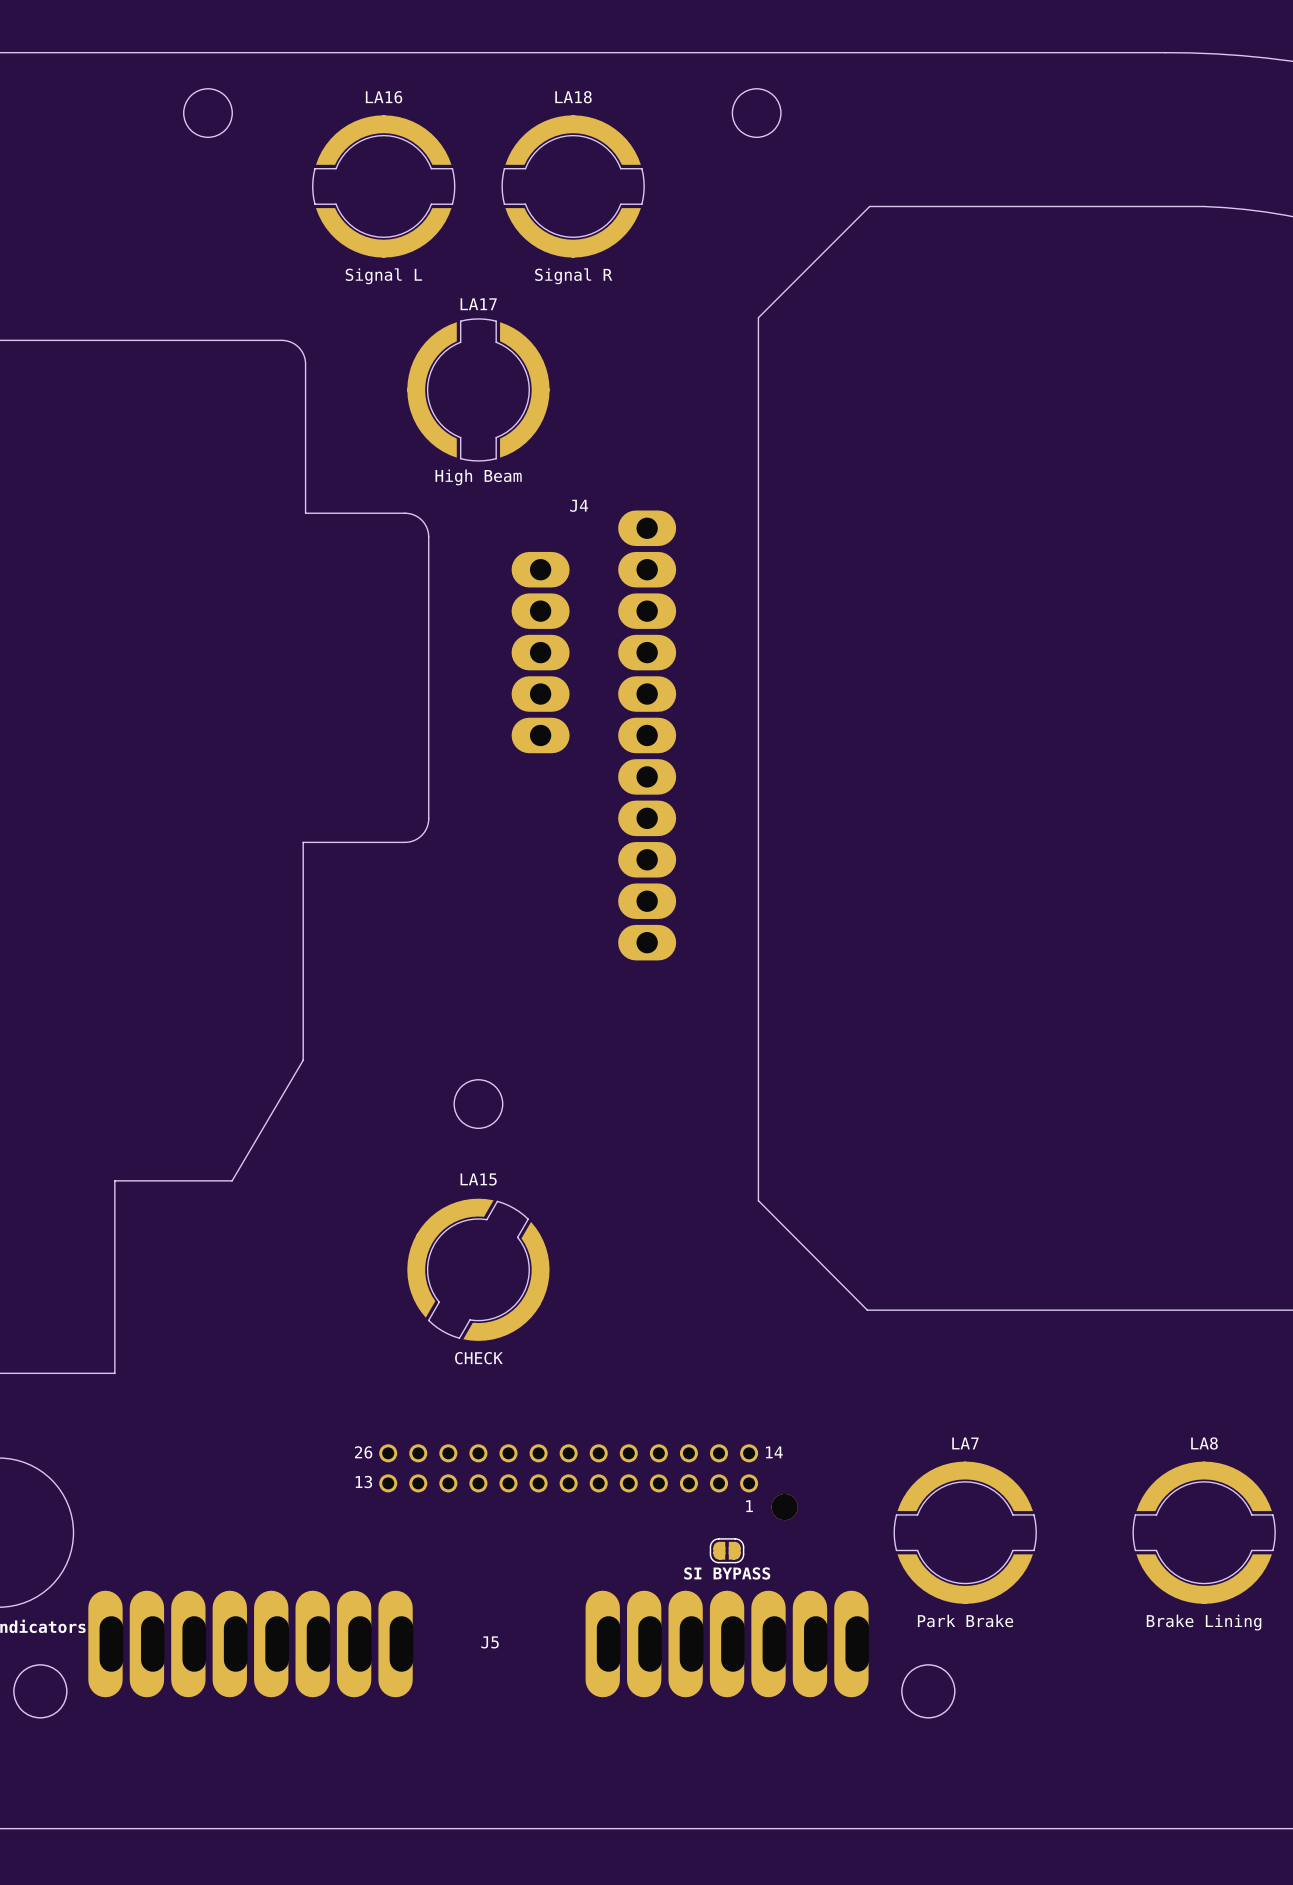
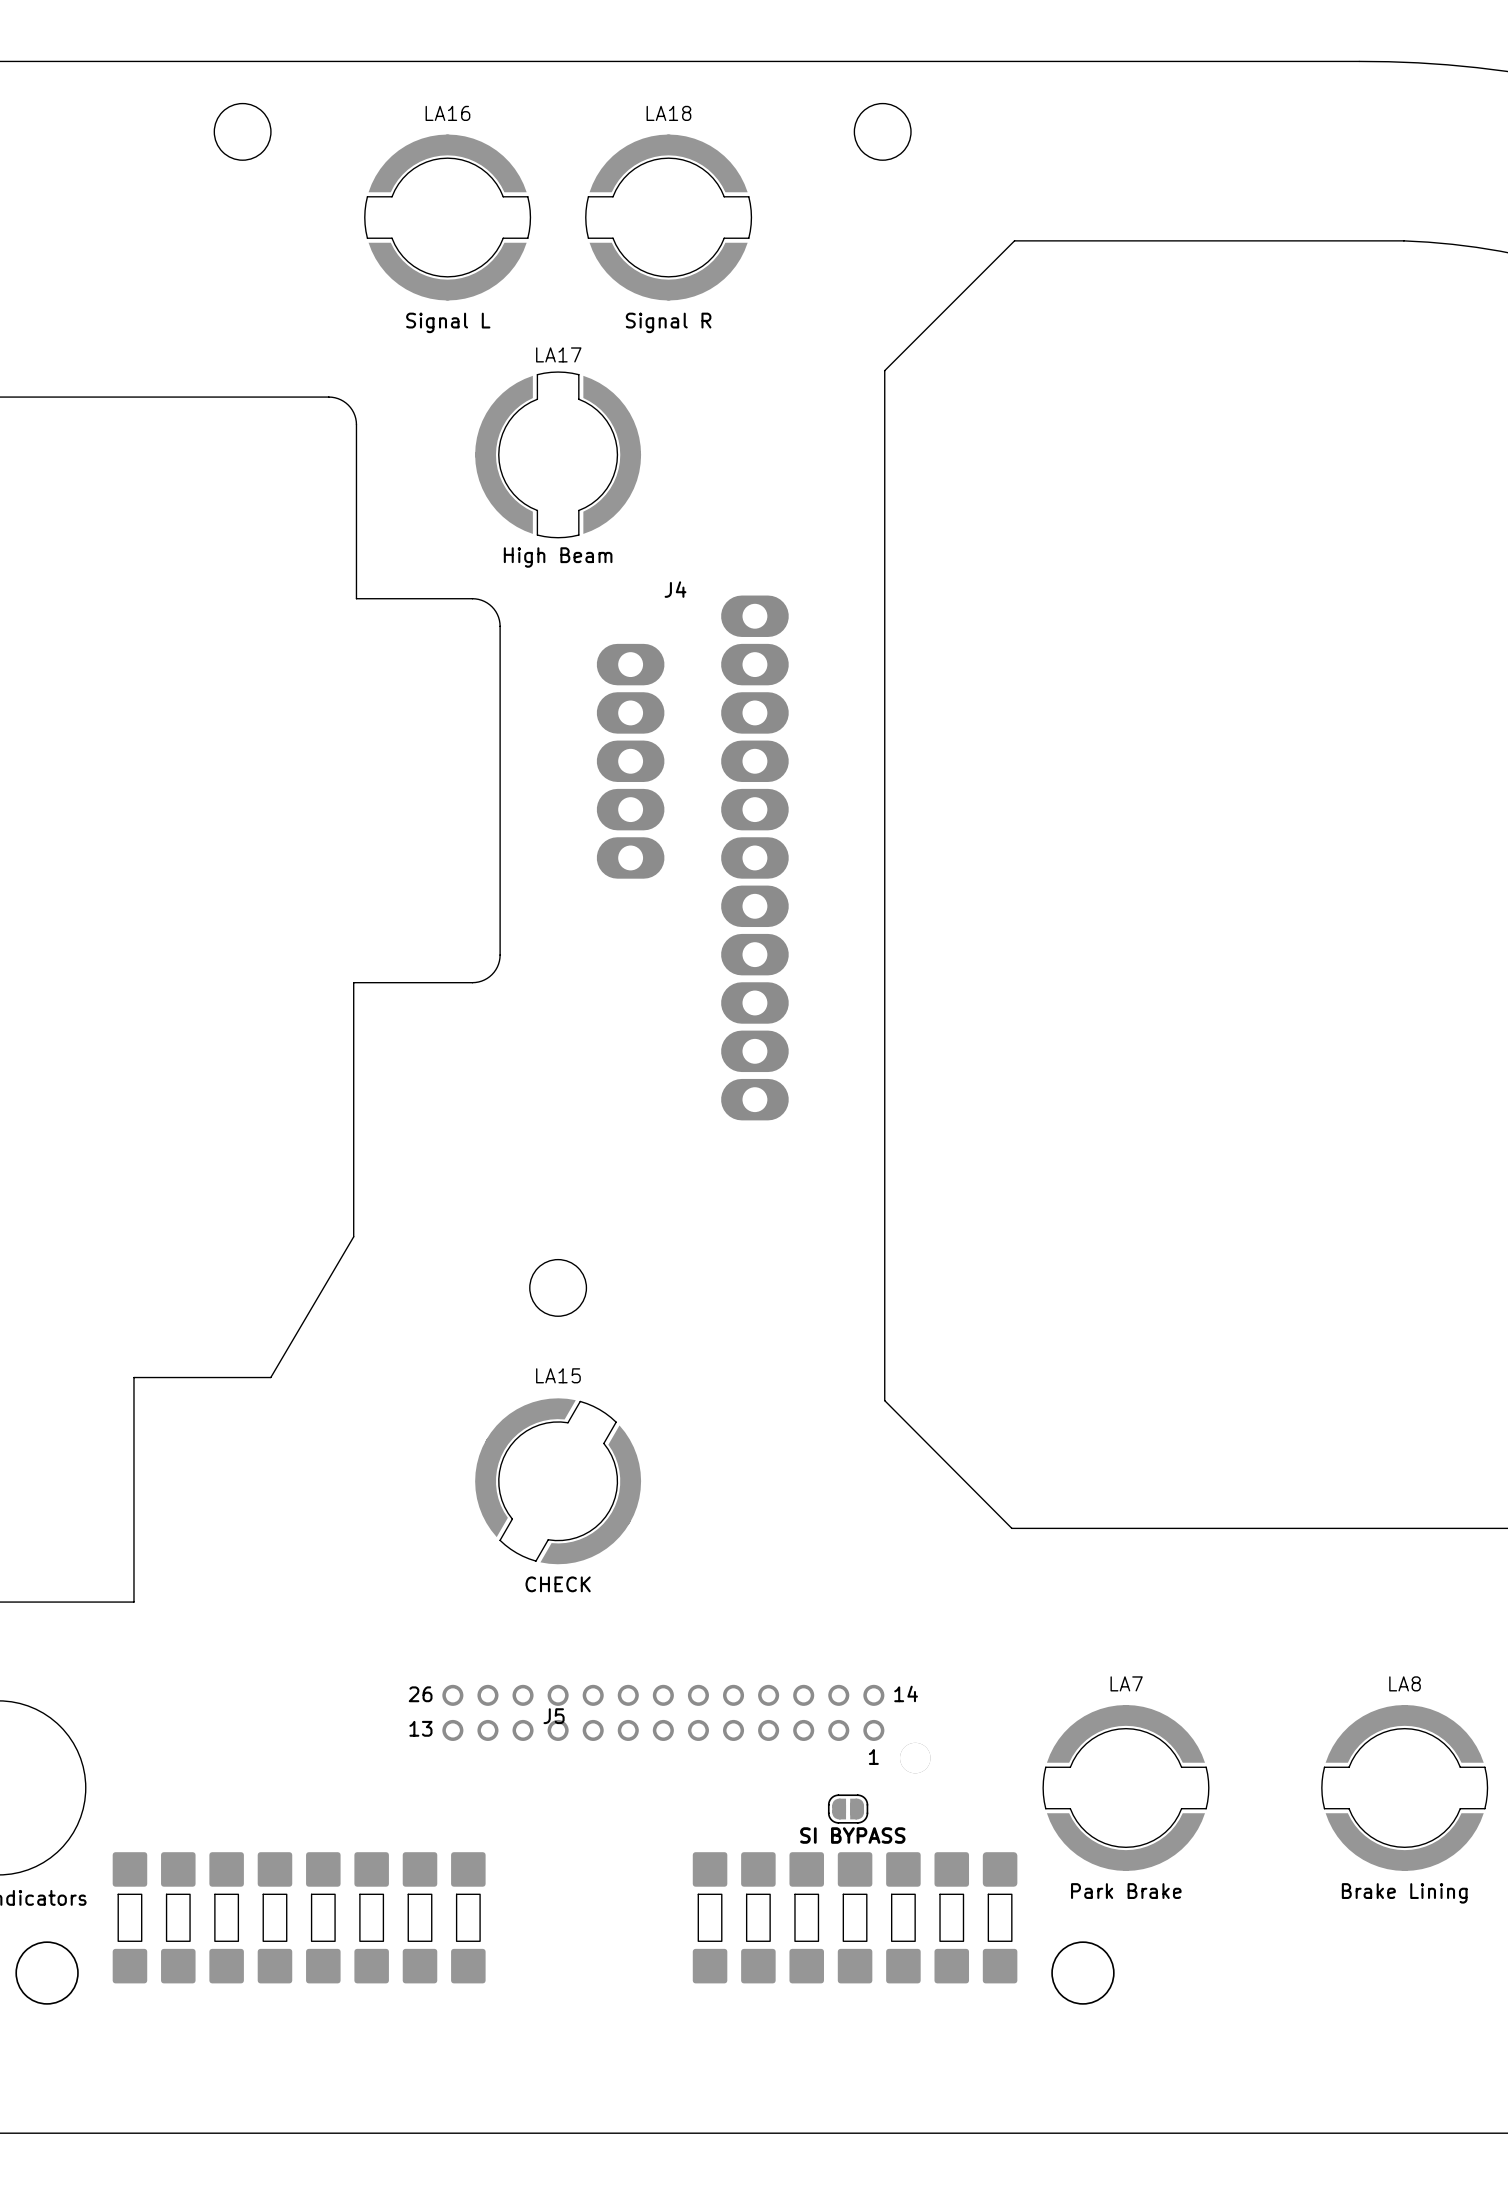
J5 footprint: [13, 1590, 956, 1719] -> [15, 1852, 1115, 2005]
J5 name position: J5 (490, 1642) -> J5 (554, 1716)

